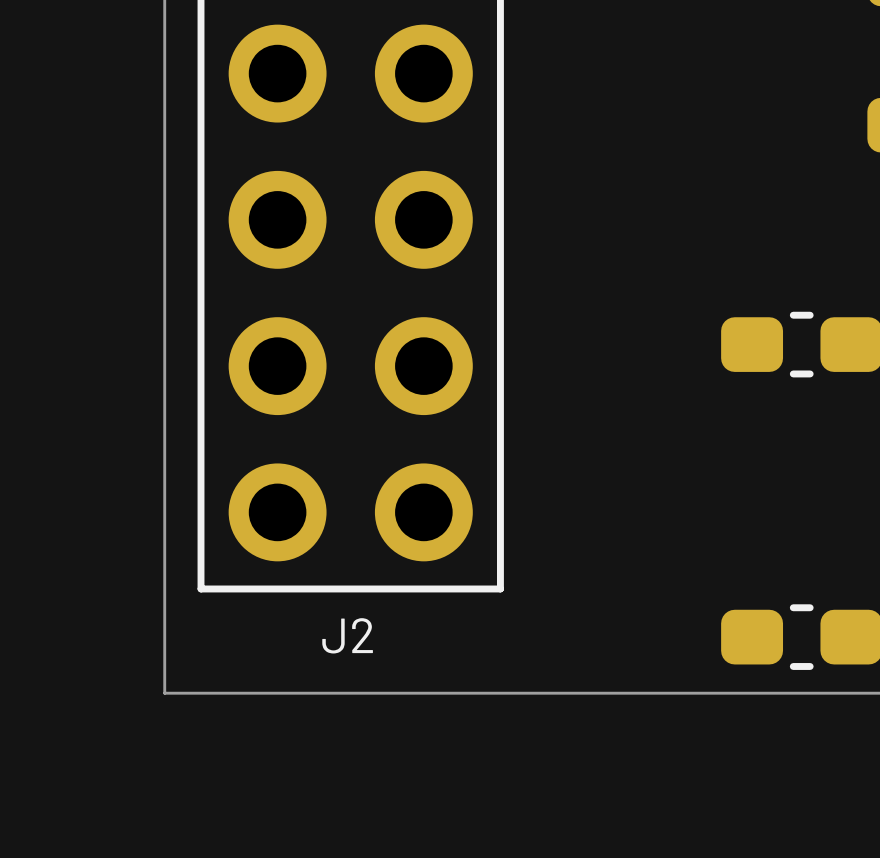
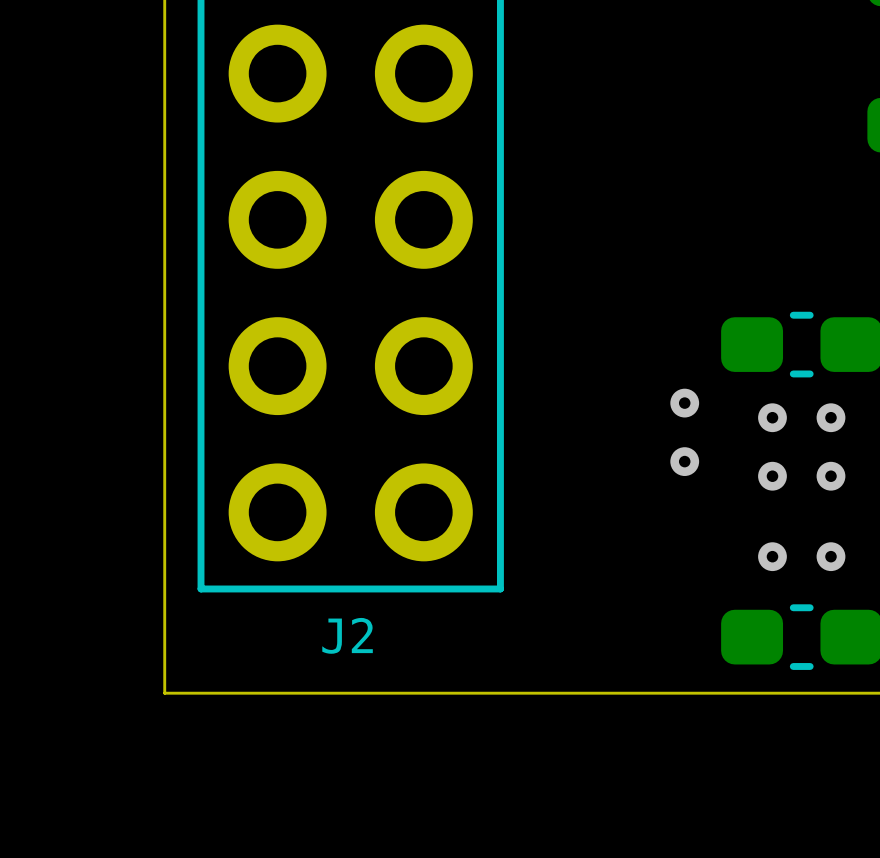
via: none -> (684, 403)
via: none -> (772, 417)
via: none -> (830, 417)
via: none -> (684, 461)
via: none -> (772, 476)
via: none -> (830, 476)
via: none -> (772, 556)
via: none -> (830, 556)

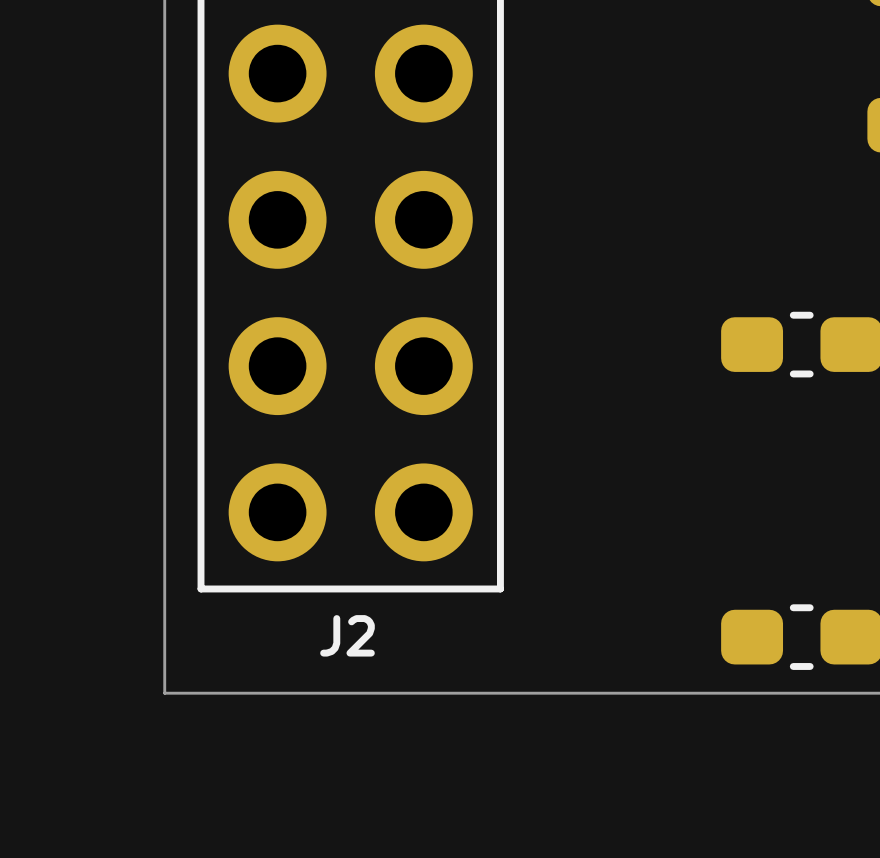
via: (684, 403) -> none
via: (772, 417) -> none
via: (830, 417) -> none
via: (684, 461) -> none
via: (772, 476) -> none
via: (830, 476) -> none
via: (772, 556) -> none
via: (830, 556) -> none

